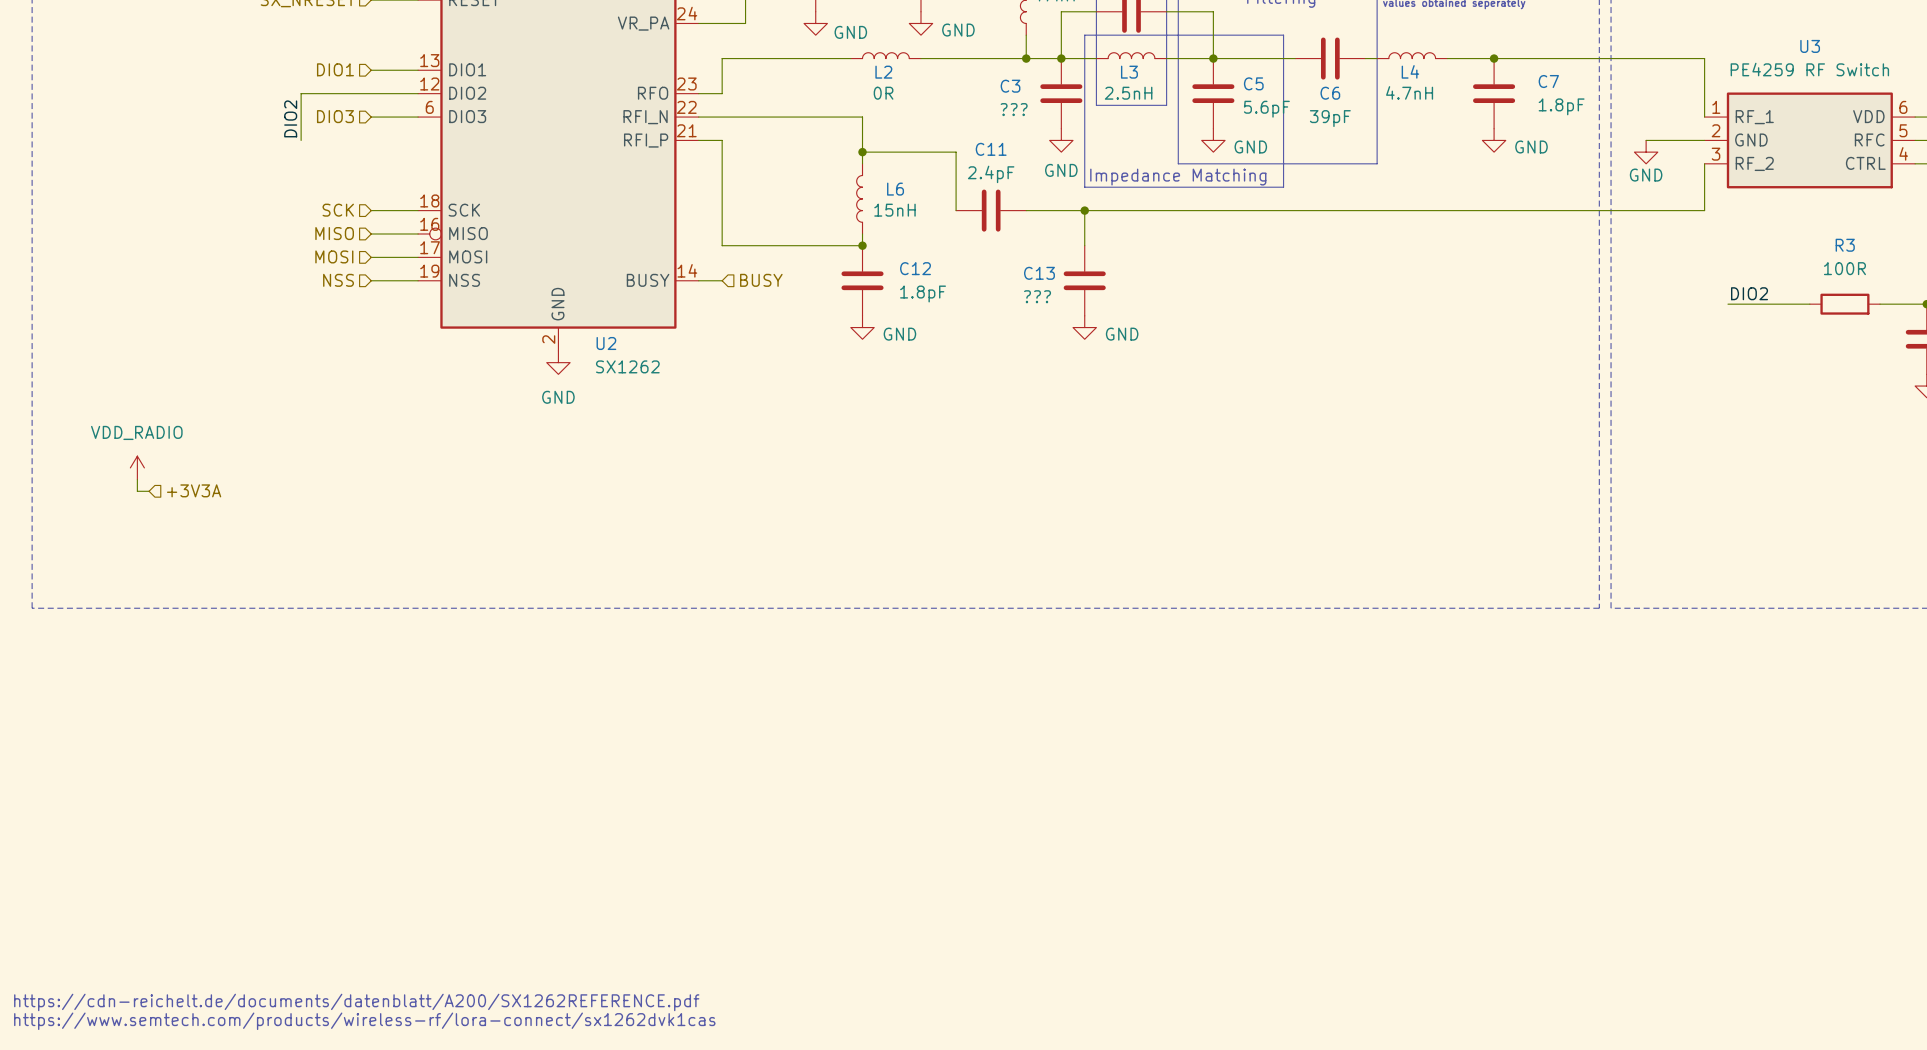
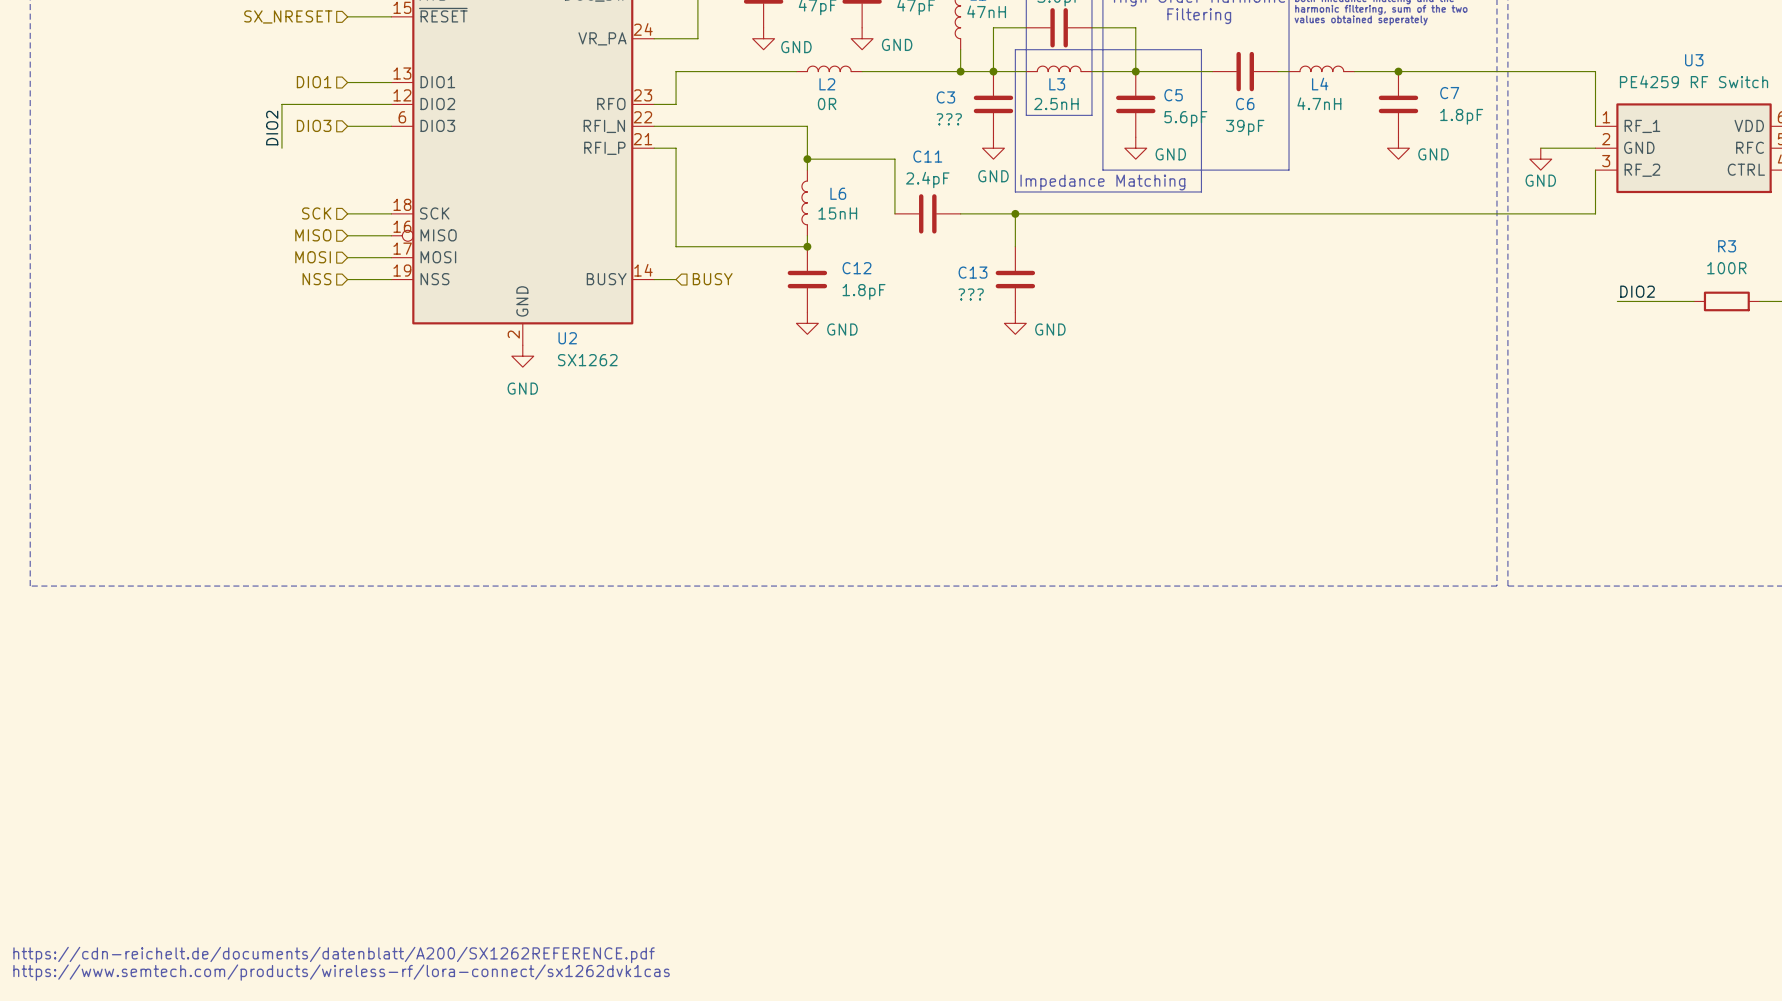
power symbol: VDD_RADIO (137, 467) -> none
wire: (137, 479) (137, 491) (149, 491) -> none
hierarchical label: +3V3A (194, 490) -> none

